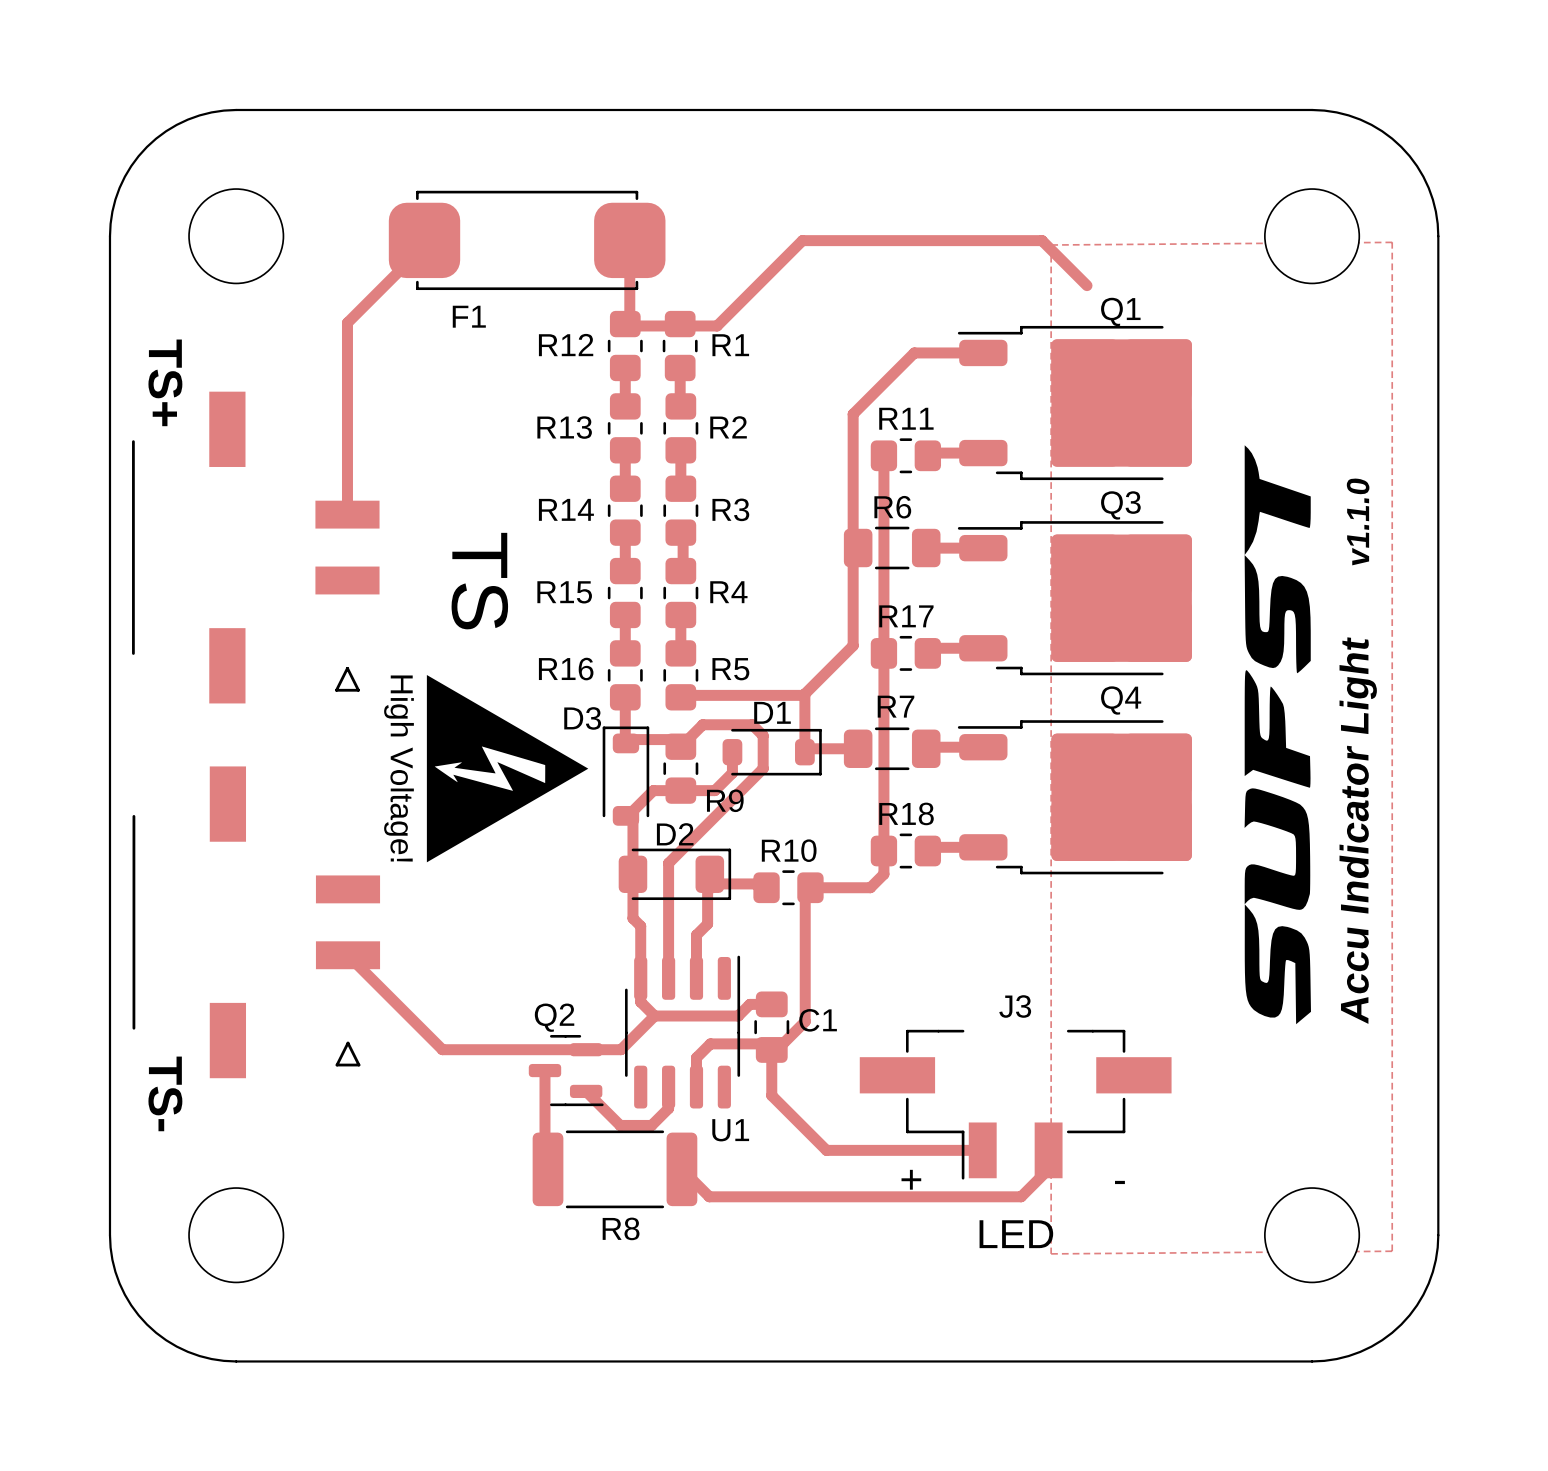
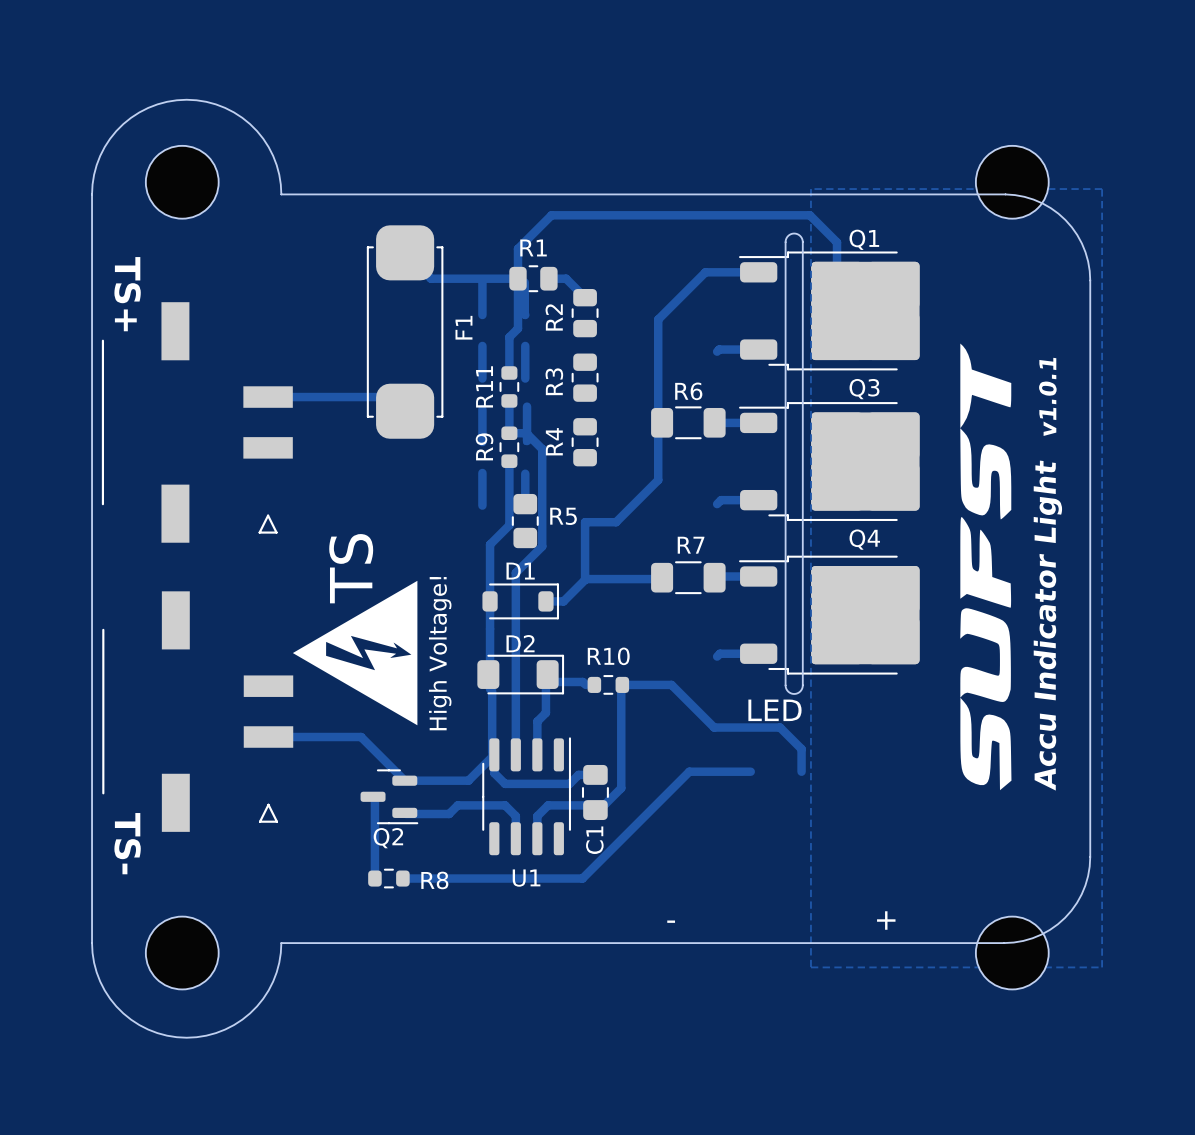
board edge: (236, 109) (1312, 109) (1336, 112) (1360, 119) (1382, 131) (1401, 146) (1417, 166) (1428, 187) (1435, 211) (1438, 236) (1438, 1235) (1435, 1259) (1428, 1283) (1417, 1305) (1401, 1324) (1382, 1340) (1360, 1351) (1336, 1359) (1312, 1361) (236, 1361) (211, 1359) (187, 1351) (166, 1340) (146, 1324) (131, 1305) (119, 1283) (112, 1259) (109, 1235) (110, 223) (115, 199) (124, 176) (146, 146) (166, 131) (187, 119) (211, 112) (236, 109) -> (92, 194) (92, 943) (96, 972) (104, 990) (116, 1006) (131, 1019) (148, 1029) (176, 1037) (206, 1035) (225, 1029) (242, 1019) (263, 998) (276, 972) (281, 943) (1004, 943) (1023, 940) (1041, 934) (1057, 924) (1071, 910) (1085, 885) (1090, 857) (1090, 280) (1088, 261) (1081, 243) (1071, 227) (1058, 213) (1033, 199) (1005, 194) (281, 194) (276, 165) (268, 147) (257, 131) (242, 117) (225, 107) (206, 101) (186, 99) (157, 104) (139, 112) (123, 124) (110, 138) (100, 155) (94, 174) (92, 194)
track: (424, 240) (424, 245) (347, 322) (347, 514) -> (390, 397) (268, 397)
F1 rotation: 0° (527, 240) -> 90° clockwise (405, 332)
F1 position: (527, 240) -> (405, 332)
track: (629, 240) (629, 321) (625, 325) (717, 325) (802, 240) (1042, 240) (1087, 285) -> none
zone outline: (1051, 245) (1392, 242) (1392, 1251) (1051, 1253) -> (810, 189) (1102, 189) (1102, 967) (810, 967)
R1 footprint: [662, 310, 698, 382] -> [509, 265, 558, 293]
board edge: none -> (785, 242) (785, 685) (788, 691) (794, 693) (799, 691) (802, 685) (802, 242) (800, 236) (794, 233) (788, 236) (785, 242)
F1 name position: F1 (469, 316) -> F1 (463, 327)
track: none -> (405, 252) (430, 278) (517, 278)
R1 name position: R1 (730, 345) -> R1 (533, 247)
R12: (625, 346) -> none
track: none -> (548, 278) (566, 278) (585, 297)
track: none -> (837, 285) (837, 242) (809, 215) (551, 215) (517, 248) (517, 328) (509, 337) (509, 372)
R2 footprint: [663, 393, 699, 464] -> [571, 289, 599, 338]
R11 name position: R11 (906, 418) -> R11 (484, 386)
R2 name position: R2 (728, 427) -> R2 (554, 317)
R13: (625, 428) -> none
R11 footprint: [870, 438, 942, 474] -> [499, 366, 520, 408]
track: (883, 455) (883, 874) (870, 887) -> (801, 771) (801, 749) (780, 727) (714, 727) (671, 684)
R3 footprint: [663, 475, 699, 546] -> [571, 353, 599, 402]
R3 name position: R3 (730, 509) -> R3 (554, 381)
R14: (625, 510) -> none
text: v1.1.0 (1358, 521) -> v1.0.1 (1047, 396)
R4 footprint: [663, 557, 699, 629] -> [571, 418, 599, 467]
text rotation: 0° (479, 581) -> 180° (351, 568)
text position: TS (479, 581) -> TS (351, 568)
R4 name position: R4 (728, 592) -> R4 (554, 441)
R15: (625, 593) -> none
track: (853, 622) (853, 645) (803, 695) (680, 695) -> (658, 480) (616, 522) (585, 522) (585, 579) (563, 601) (545, 601)
R17: (905, 653) -> none
drawing: [426, 675, 589, 863] -> none
R16: (625, 675) -> none
track: (804, 694) (804, 752) (808, 748) (858, 748) -> (585, 579) (662, 577)
track: (625, 695) (625, 743) (629, 739) (687, 739) (702, 724) (752, 724) (763, 735) (763, 768) (668, 863) -> (509, 400) (509, 433) (526, 433) (542, 449) (542, 546) (515, 572) (515, 666)
R9 footprint: [663, 733, 699, 804] -> [499, 426, 520, 468]
drawing: none -> [292, 580, 418, 726]
track: (732, 752) (732, 773) (714, 790) (653, 790) (632, 811) (632, 918) (640, 926) (640, 978) -> none
D1 position: (772, 752) -> (520, 601)
text rotation: 0° (399, 768) -> 180° (440, 653)
D3: (625, 776) -> none
R9 name position: R9 (725, 800) -> R9 (484, 446)
R18: (905, 851) -> none
R10 footprint: [753, 870, 824, 906] -> [587, 675, 630, 695]
track: (348, 955) (442, 1049) (620, 1049) (654, 1016) -> (268, 737) (361, 737) (404, 780) (468, 780) (494, 754) (492, 752) (492, 691) (490, 689) (490, 544) (509, 525) (509, 461)
track: none -> (750, 771) (689, 771) (582, 878) (402, 878)
Q2 name position: Q2 (554, 1017) -> Q2 (388, 838)
C1 name rotation: 0° (818, 1020) -> 90° counterclockwise (594, 840)
C1 name position: C1 (818, 1020) -> C1 (594, 840)
track: none -> (373, 796) (374, 798) (374, 878)
track: (771, 1049) (771, 1095) (826, 1150) (982, 1150) -> none
track: (544, 1070) (544, 1166) (548, 1169) -> none
Q2 position: (566, 1070) -> (389, 796)
track: (668, 1087) (668, 1108) (651, 1125) (620, 1125) (586, 1091) -> (515, 838) (515, 816) (505, 805) (457, 805) (449, 814) (404, 812)
J3: (1015, 1104) -> none
R8 footprint: [532, 1130, 698, 1209] -> [368, 868, 410, 889]
U1 name position: U1 (730, 1130) -> U1 (526, 878)
track: (1048, 1150) (1048, 1169) (1021, 1196) (709, 1196) (681, 1169) -> none
text position: + (911, 1179) -> + (886, 920)
text position: - (1119, 1182) -> - (671, 921)
R8 name position: R8 (621, 1228) -> R8 (434, 880)
text position: LED (1016, 1234) -> LED (774, 710)

